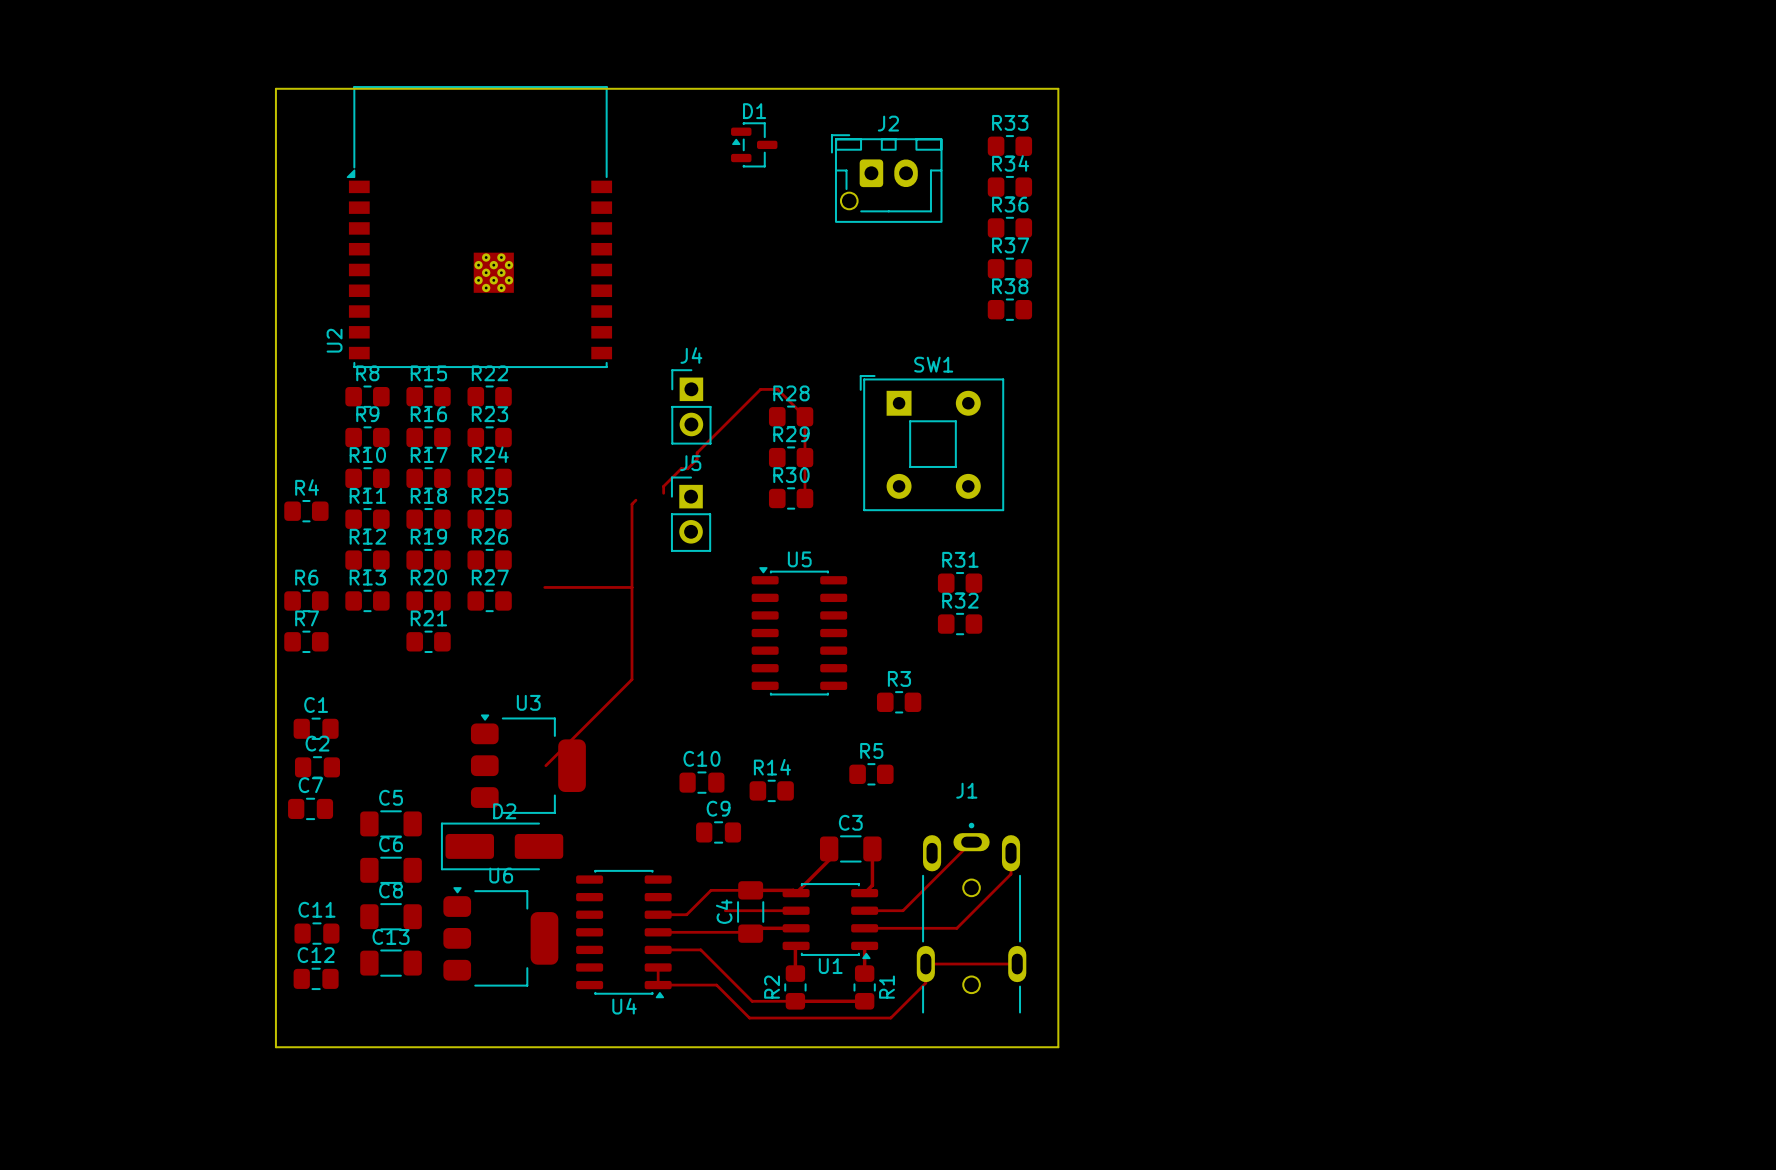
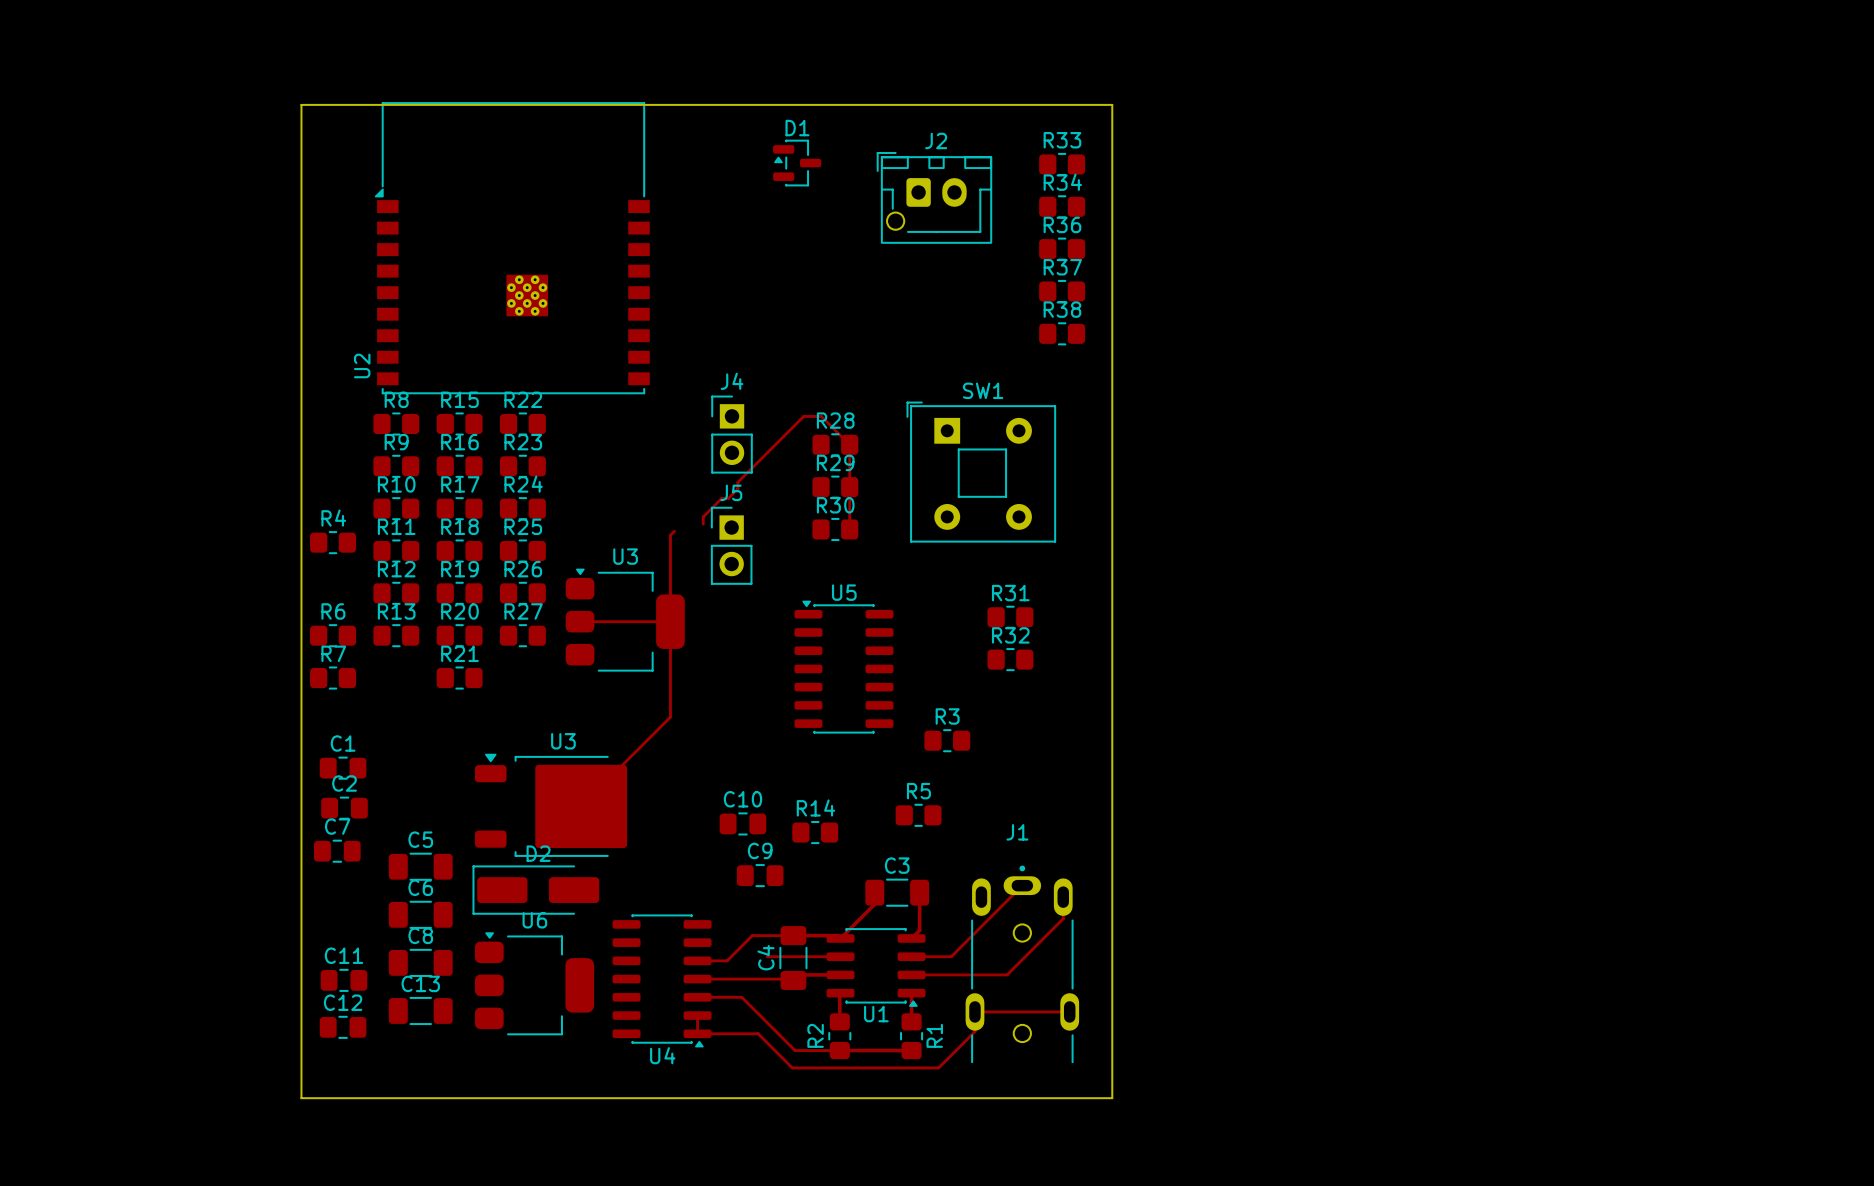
U3: none -> (625, 620)
U3 footprint: [470, 714, 586, 814] -> [474, 753, 628, 857]

